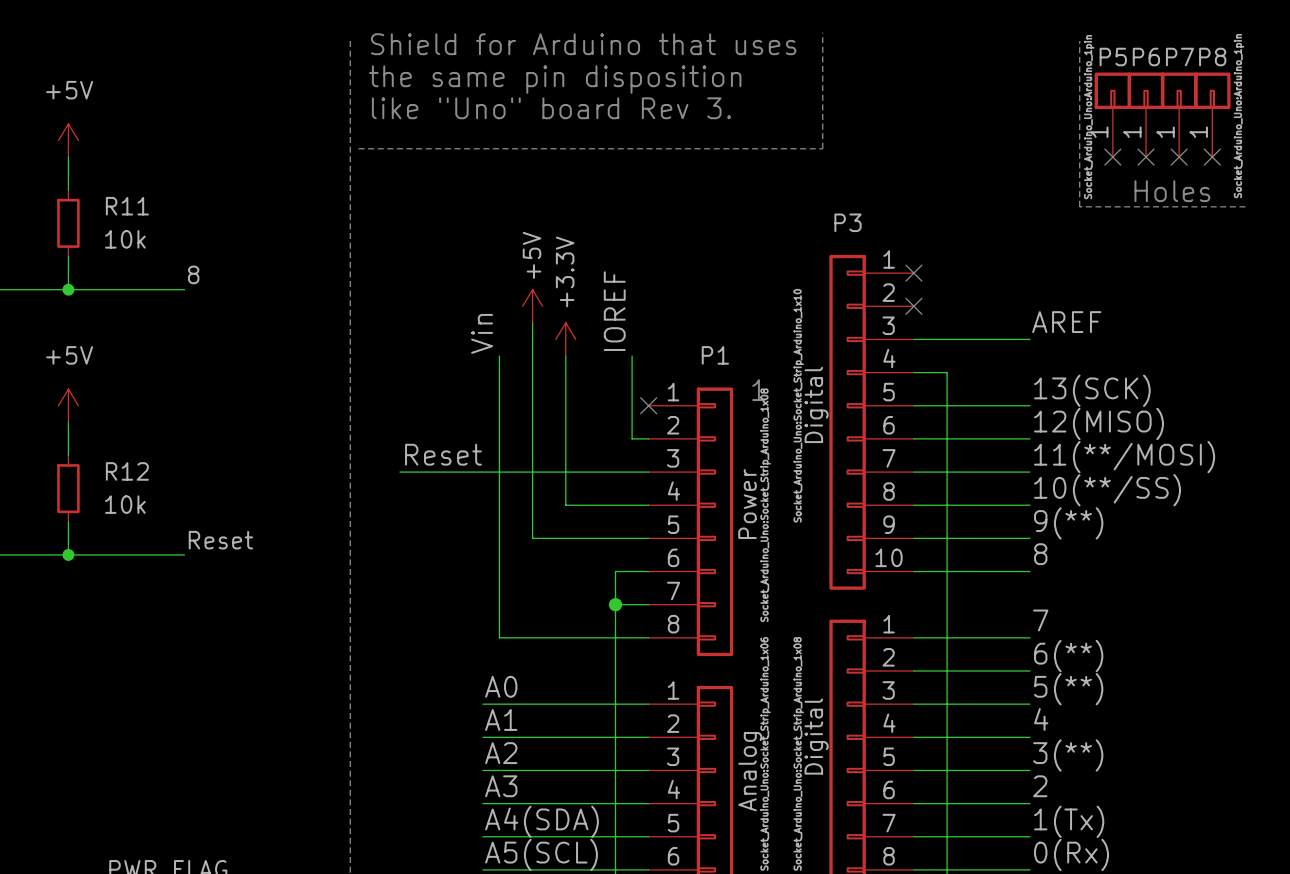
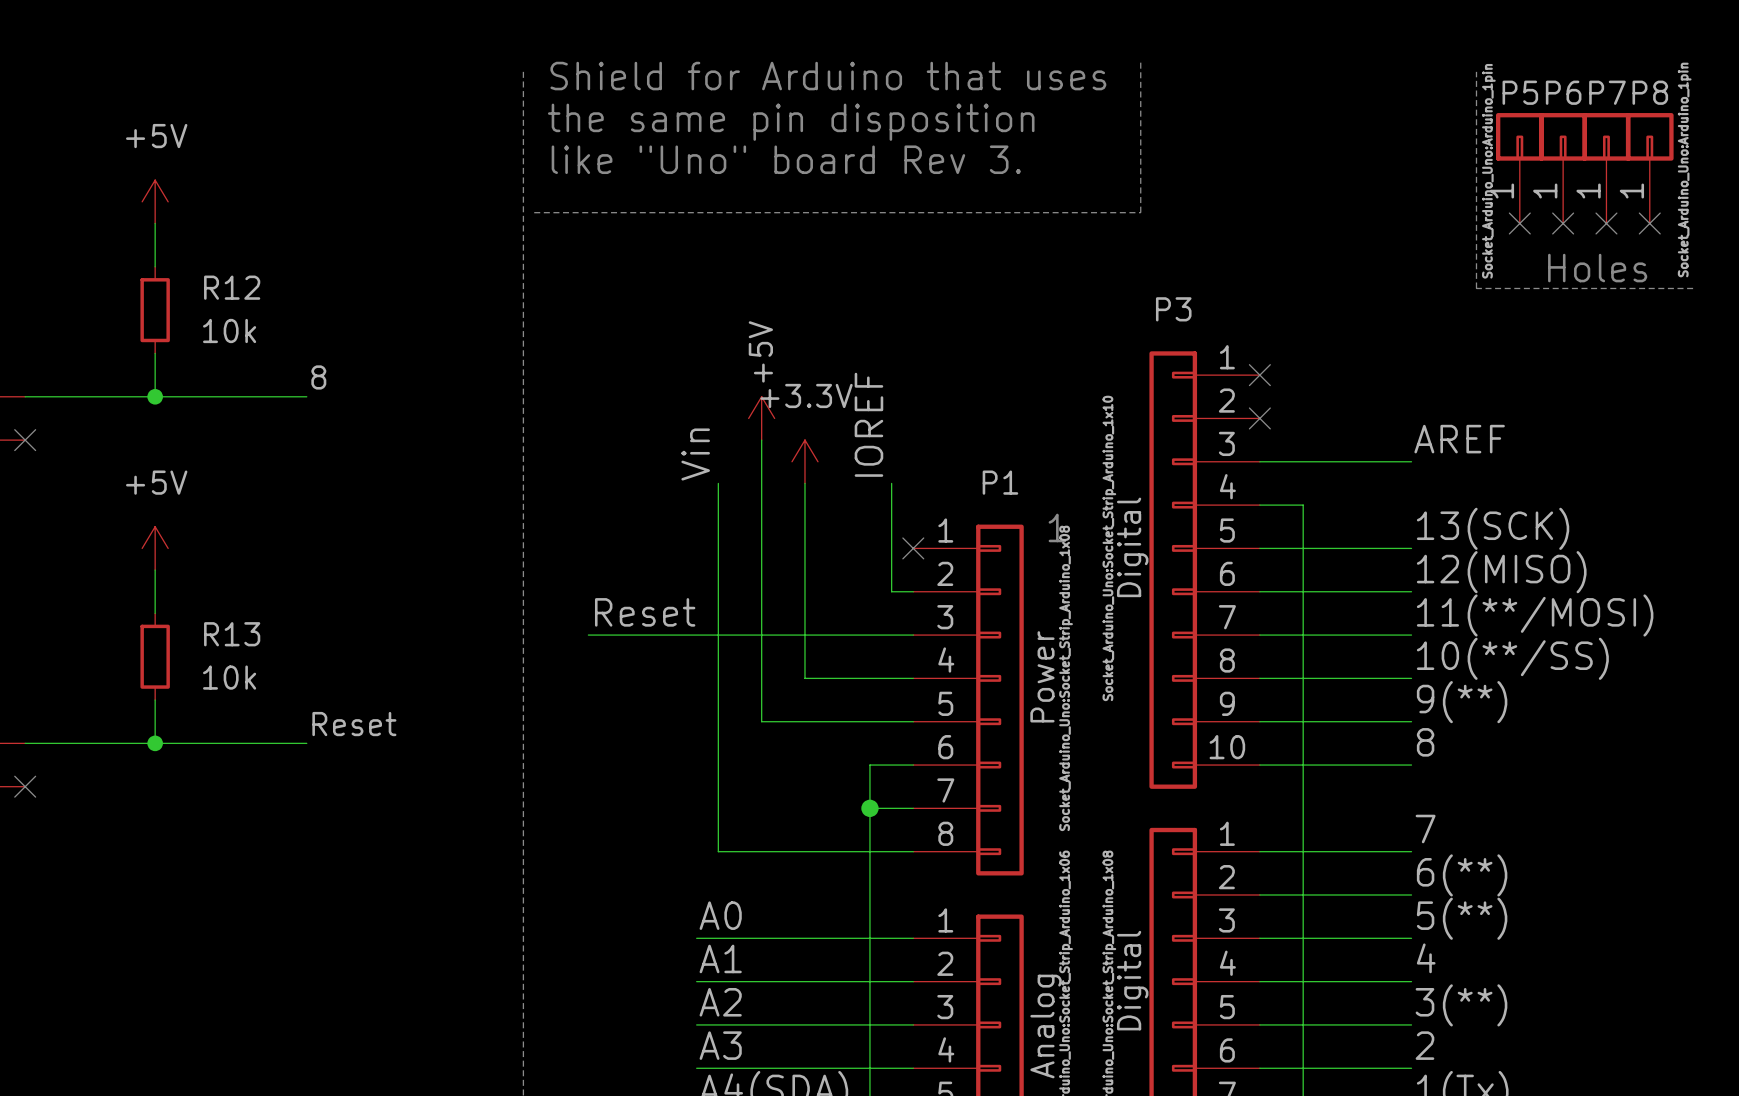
R11 name: R11 (127, 206) -> R12 (232, 287)
power symbol text rotation: 0° (565, 271) -> 90° clockwise (806, 395)
R12 name: R12 (127, 471) -> R13 (232, 634)

